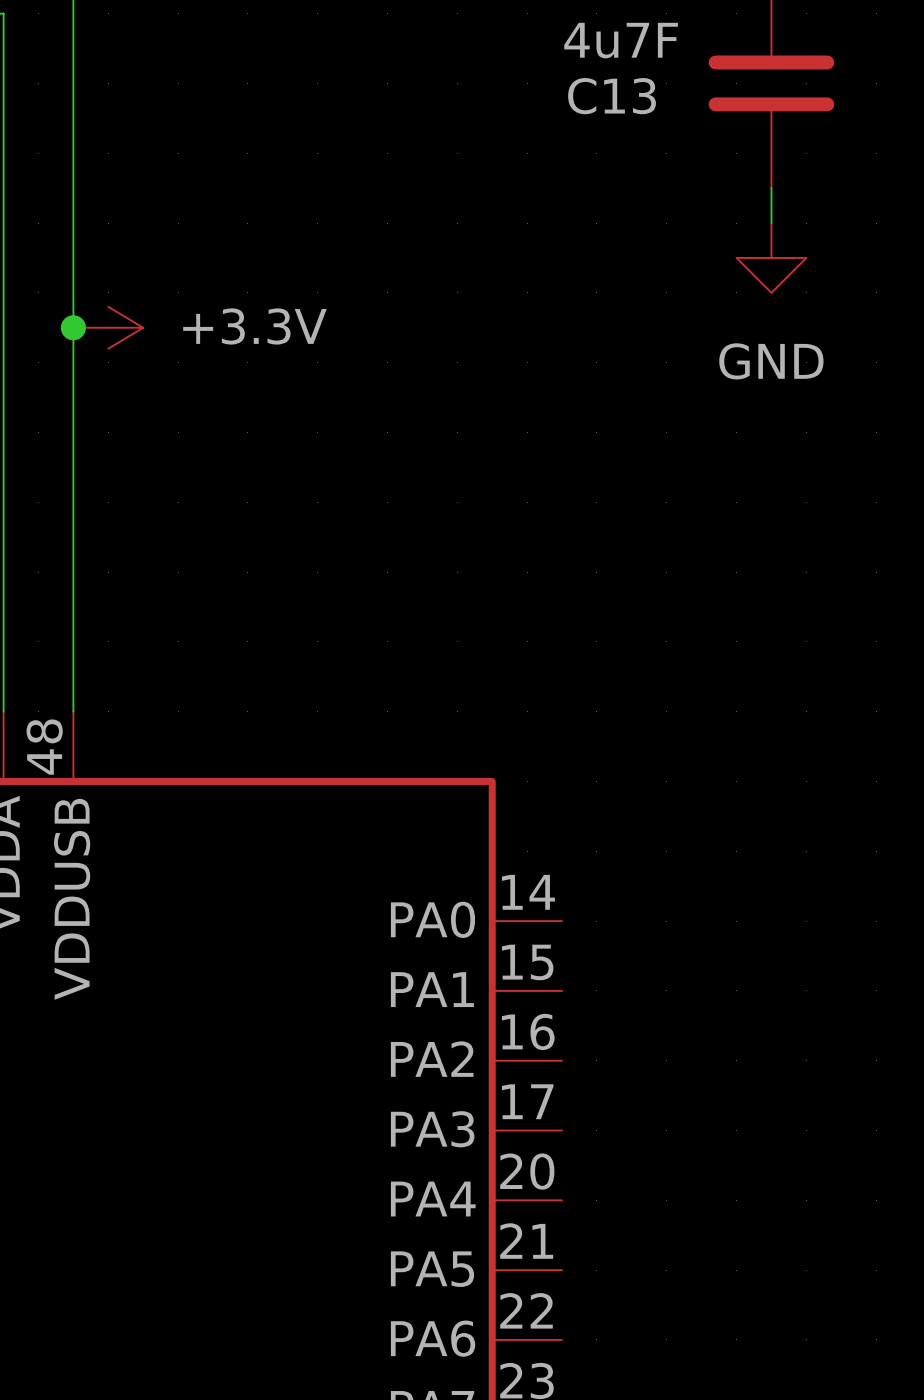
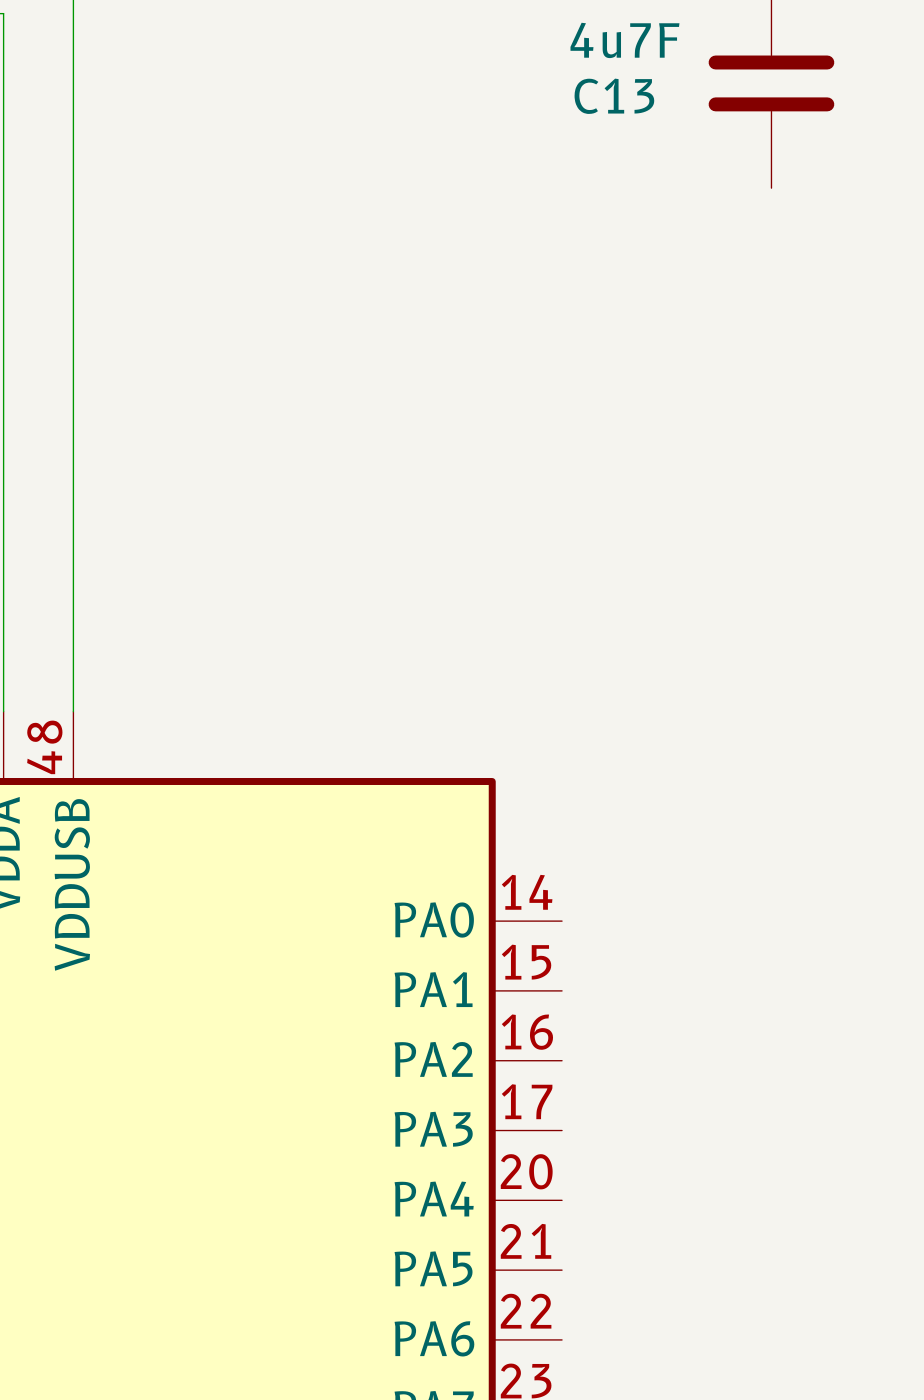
wire: (771, 188) (771, 223) -> none
power symbol: GND (771, 257) -> none
junction: (73, 327) -> none
power symbol: +3.3V (108, 327) -> none

